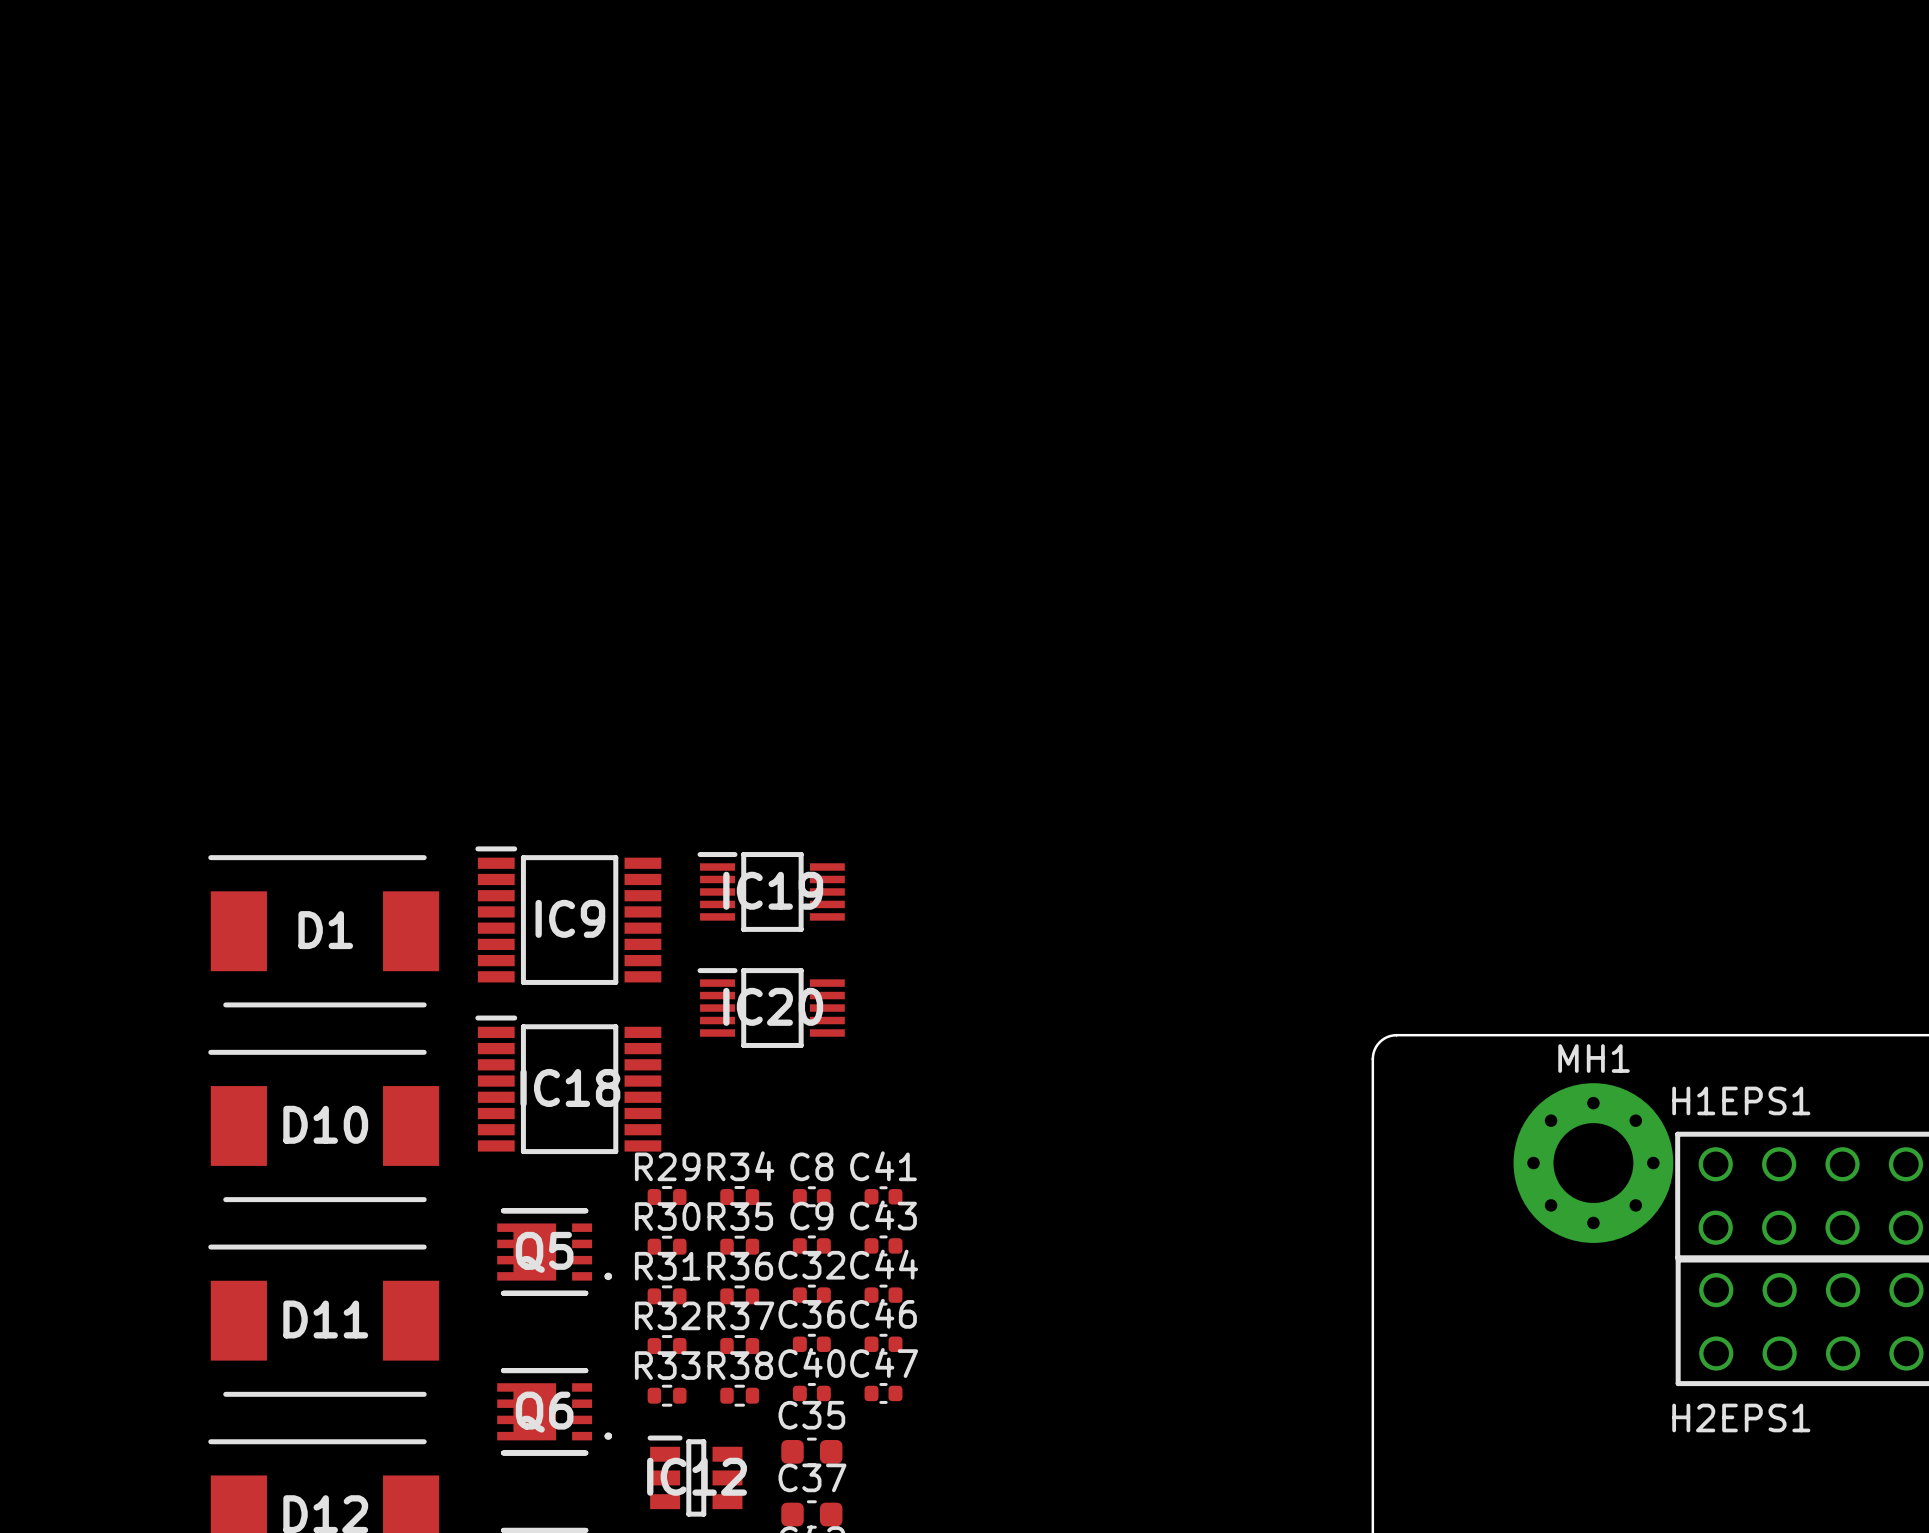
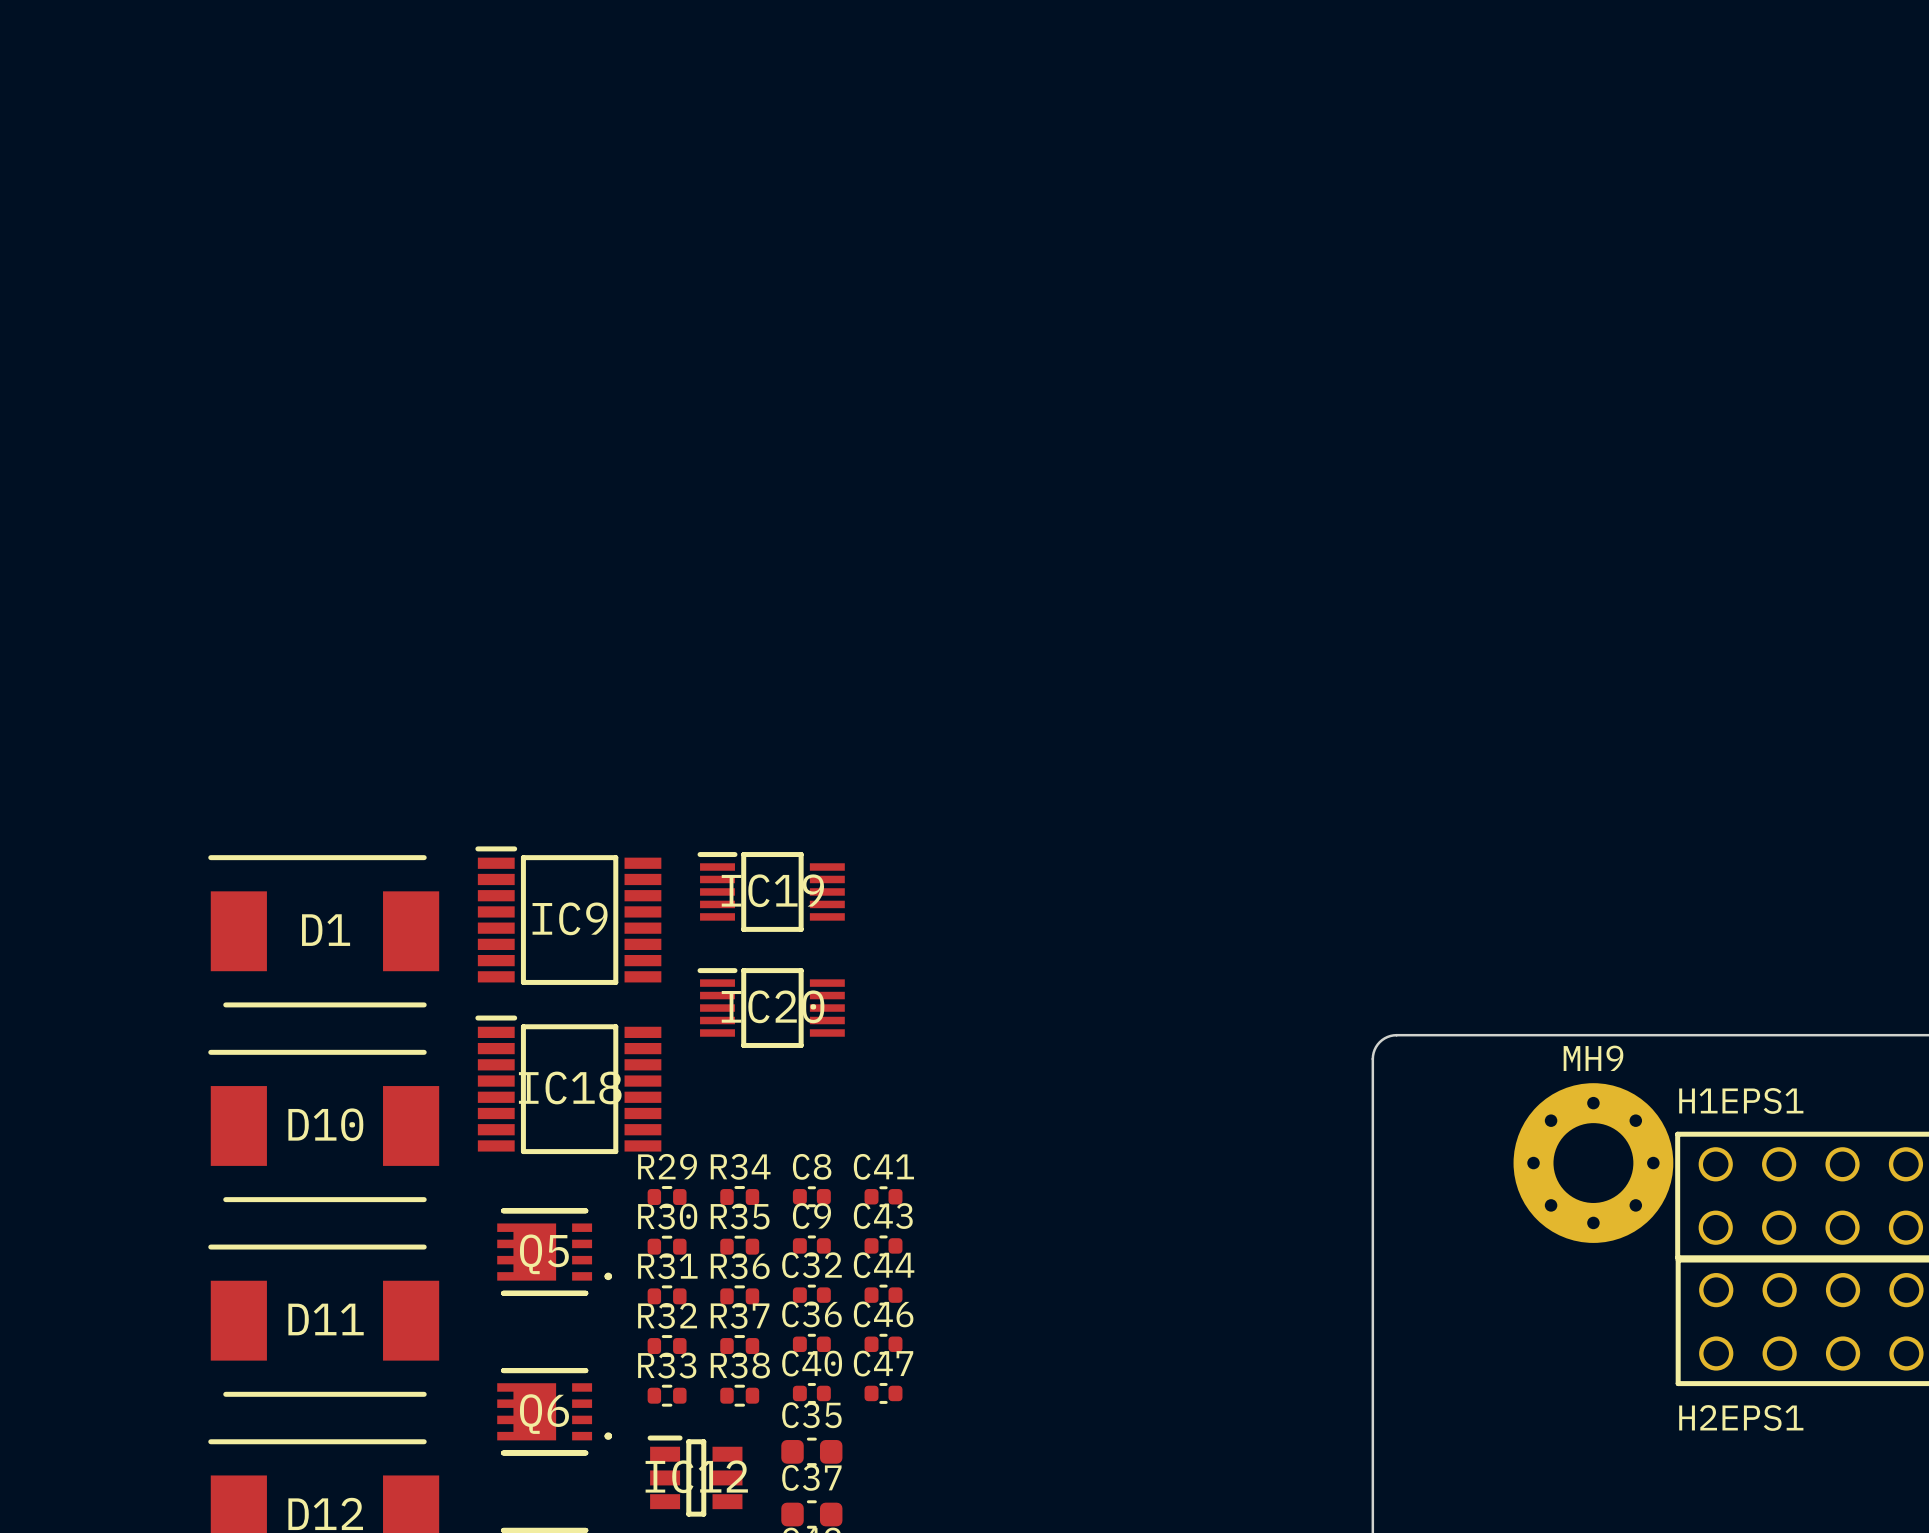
MH1 name: MH1 (1594, 1058) -> MH9 (1593, 1058)

